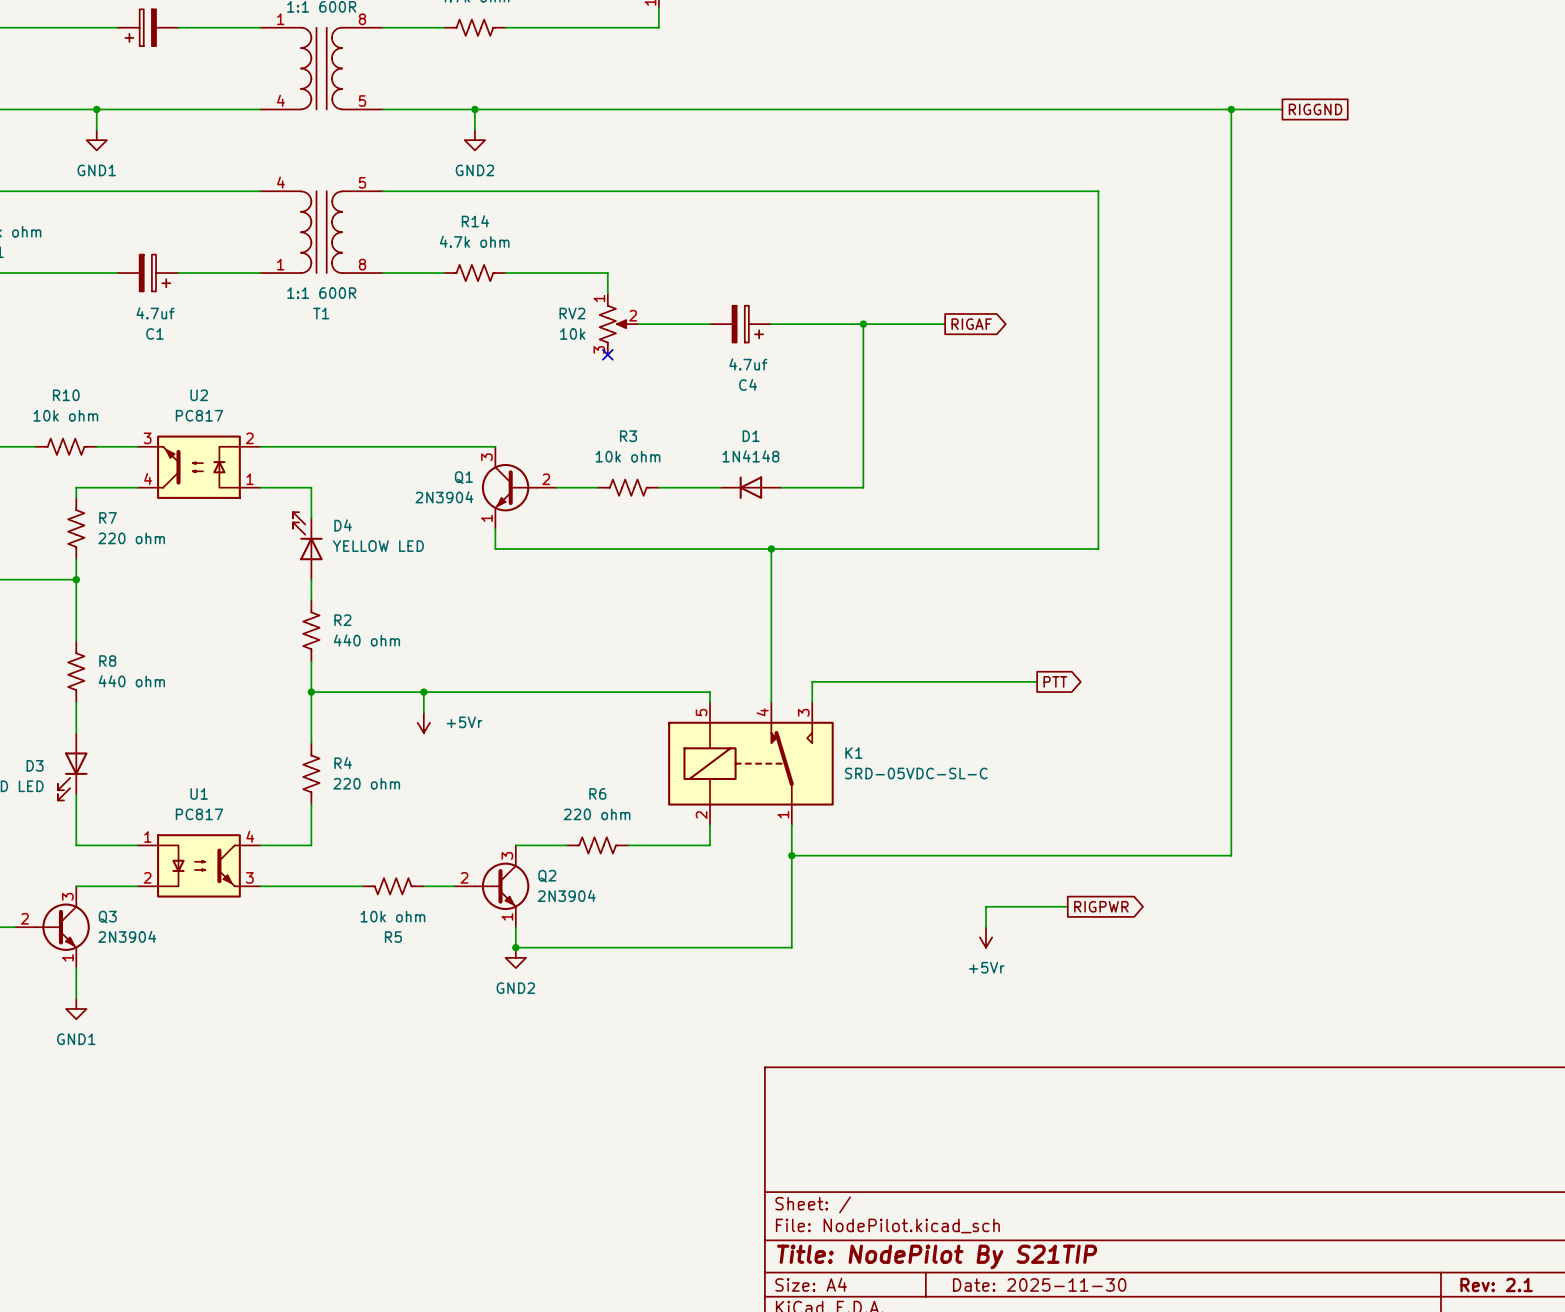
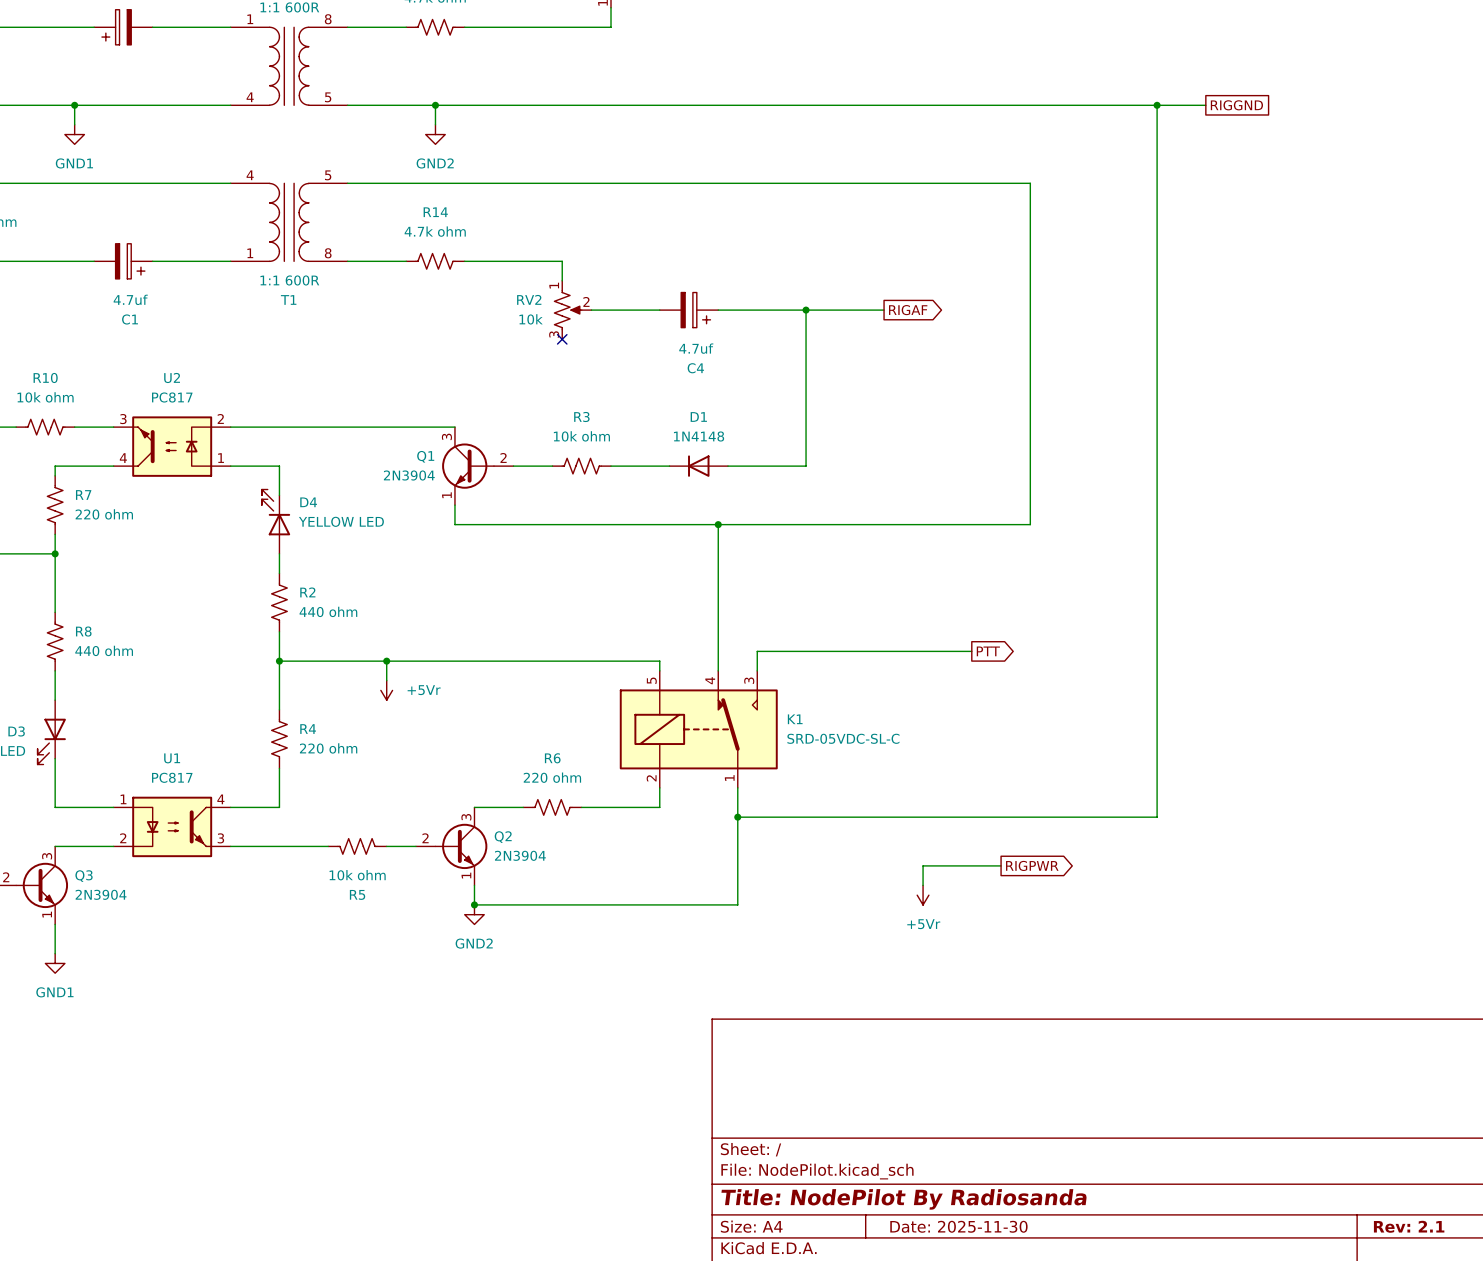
title block: Title: NodePilot By S21TIP (937, 1256) -> Title: NodePilot By Radiosanda (904, 1199)

